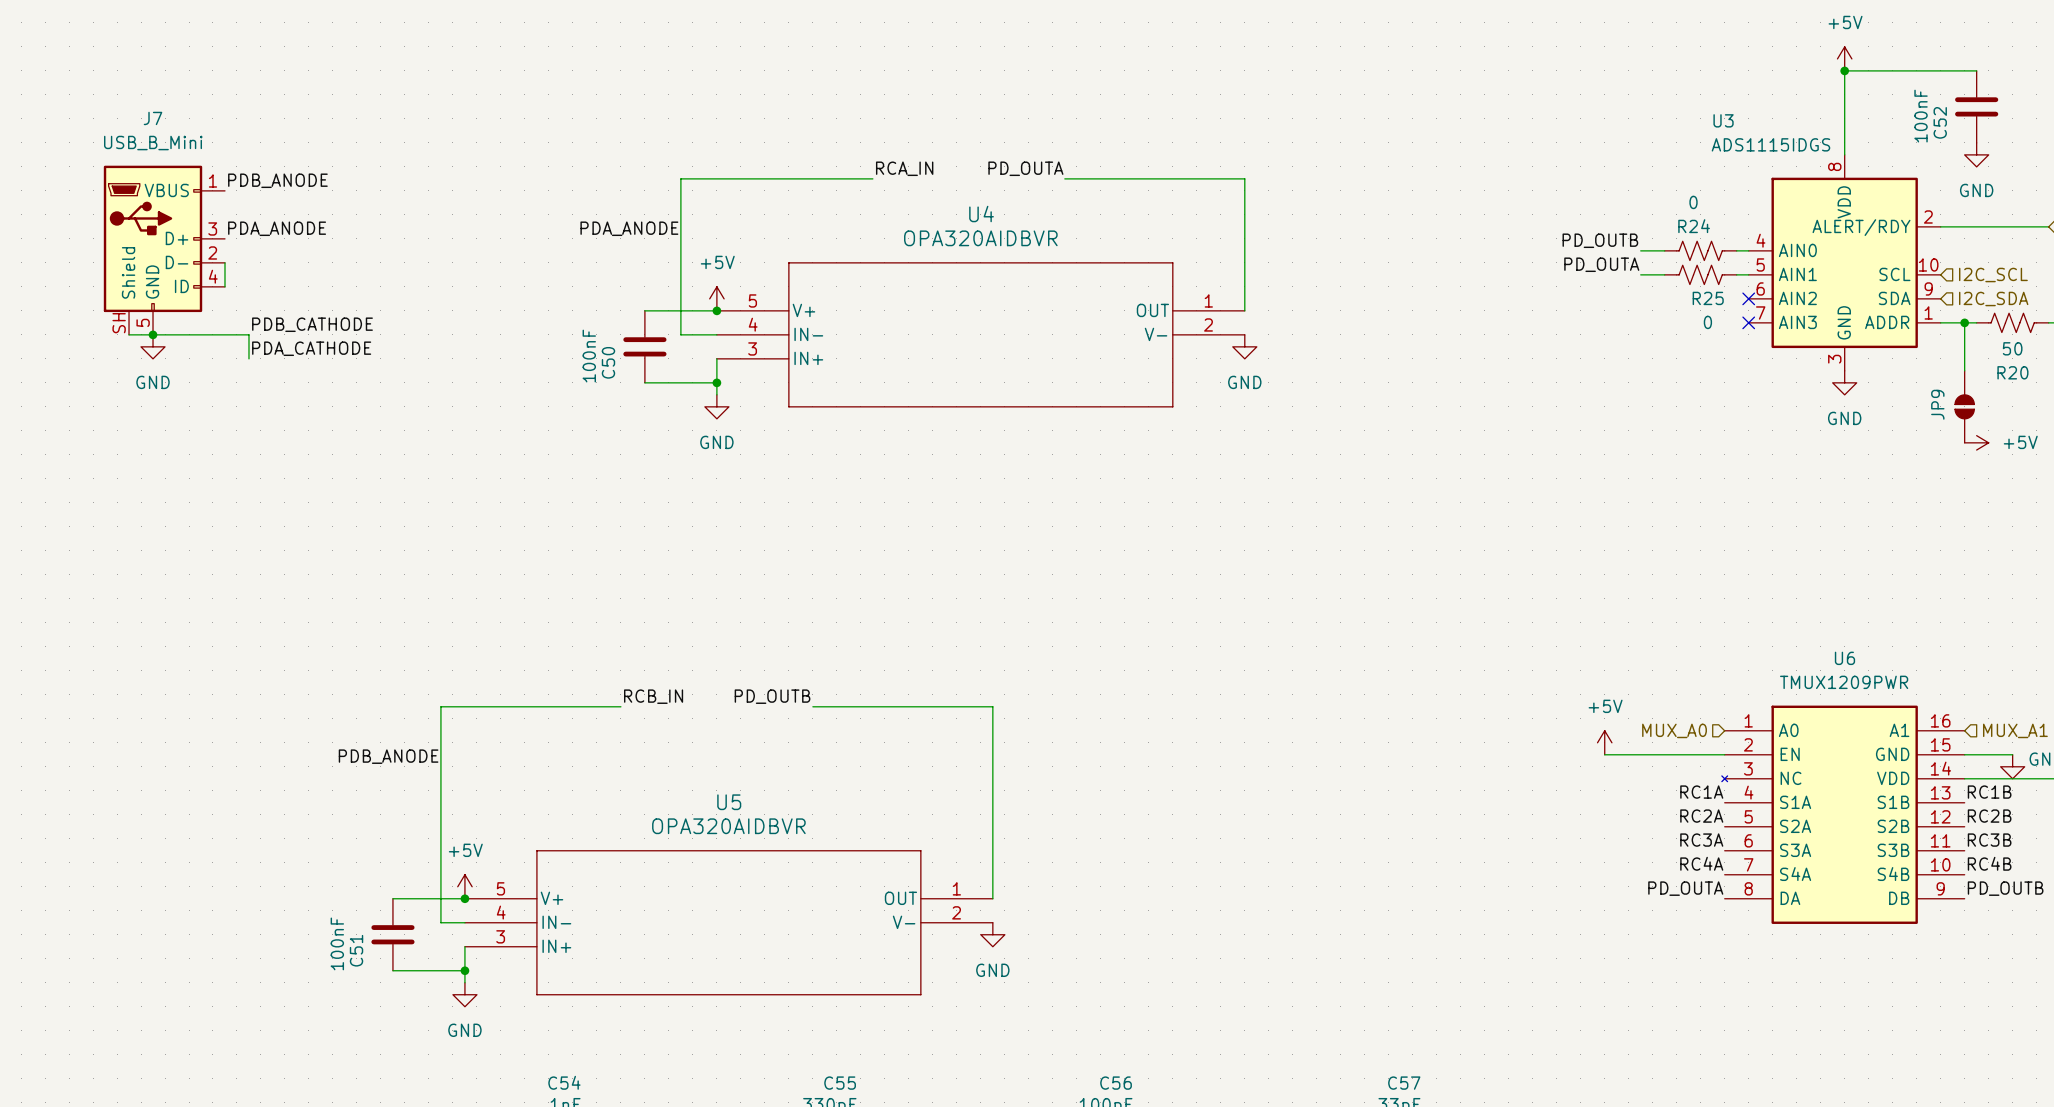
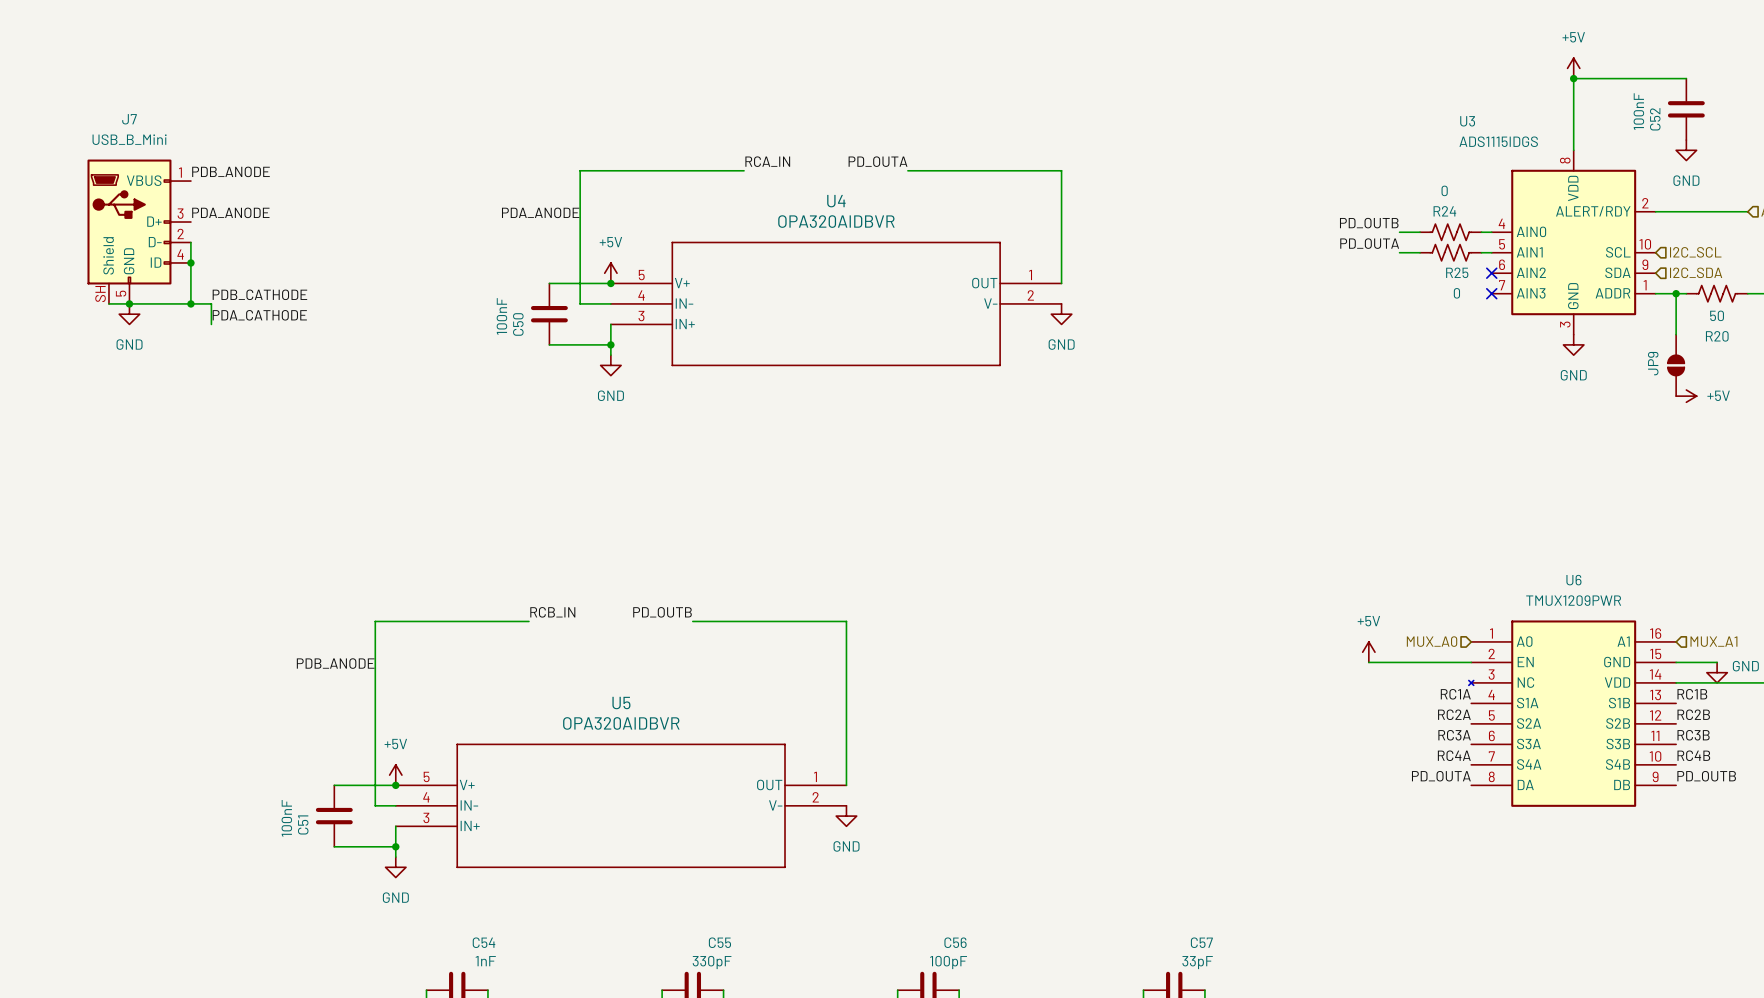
wire: none -> (190, 262) (190, 303)
junction: none -> (190, 262)
junction: none -> (190, 303)

